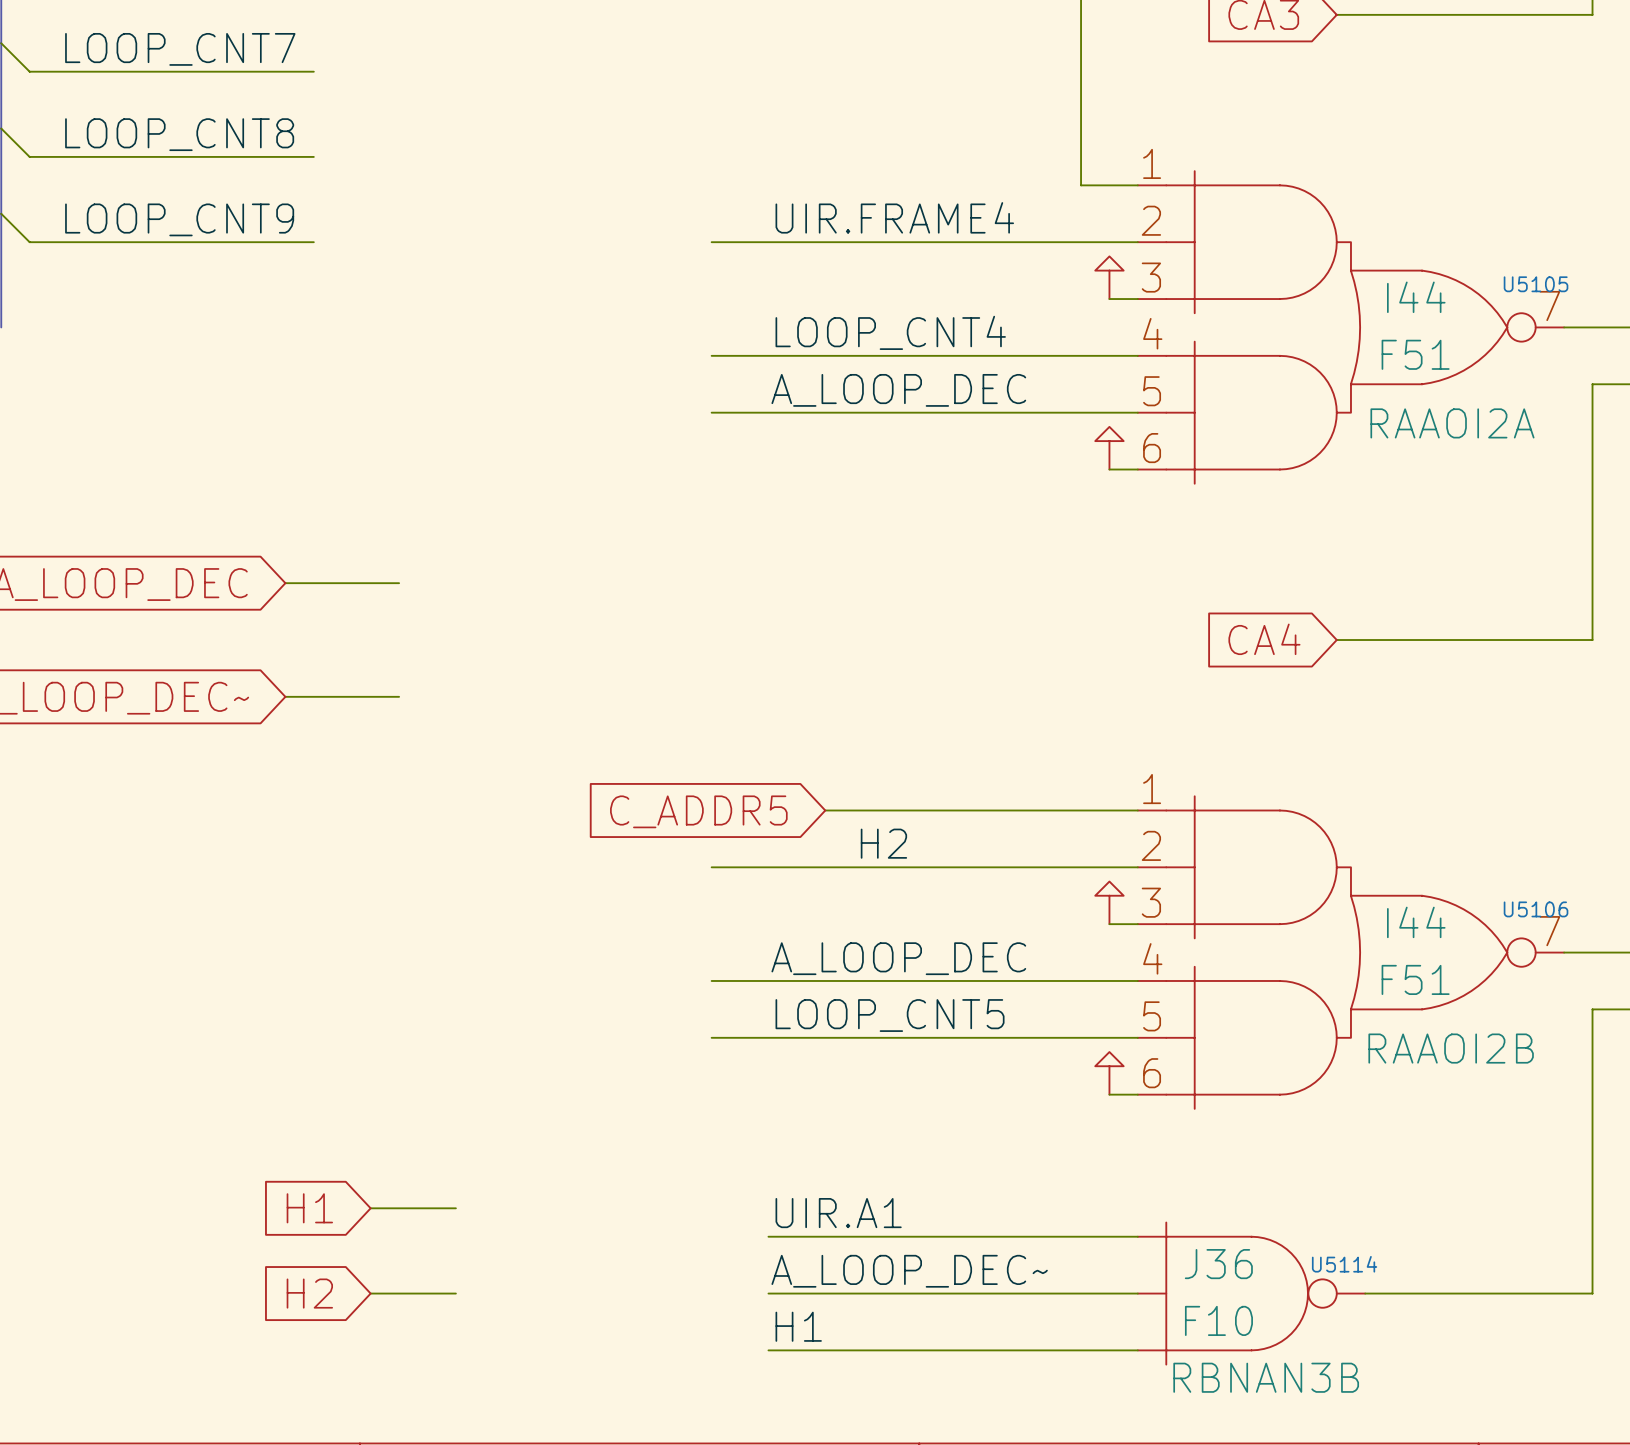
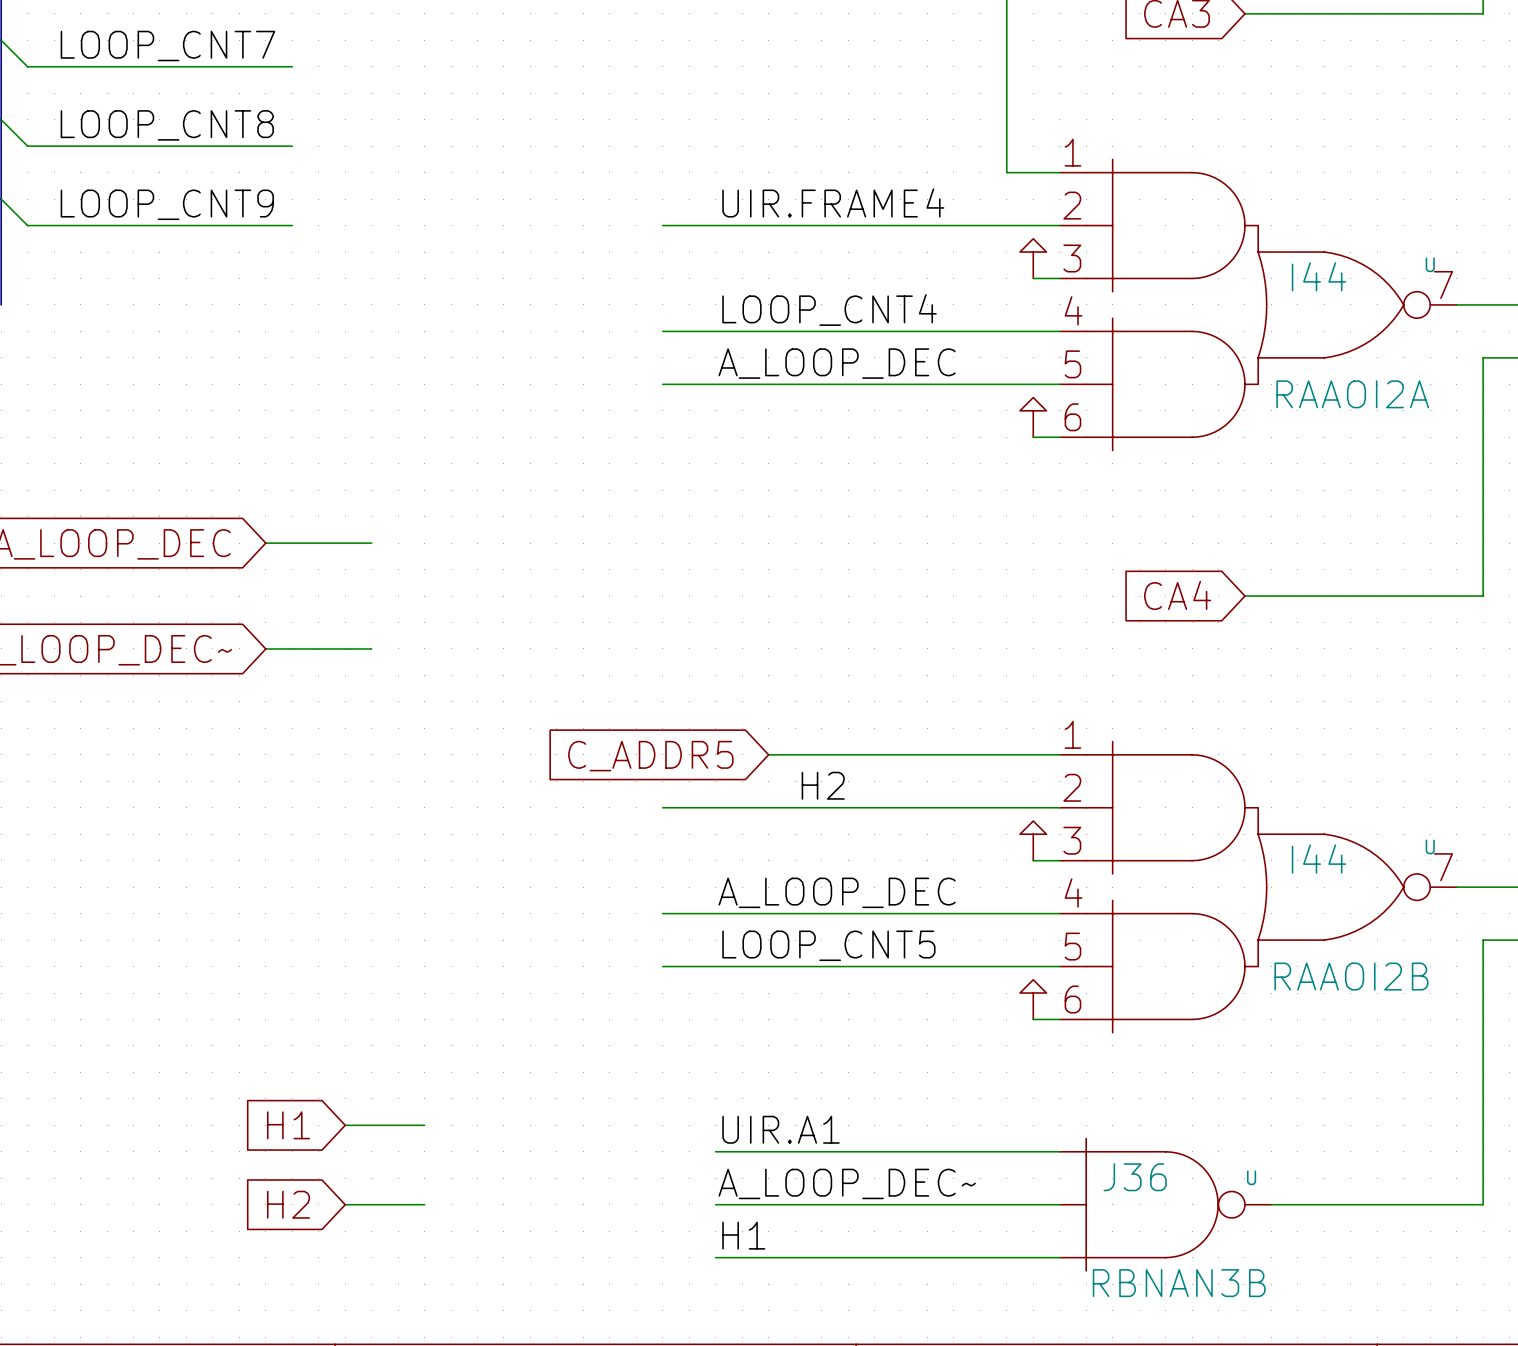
U5105 name: U5105 (1536, 284) -> U (1430, 264)
U5105 value: F51 (1415, 354) -> none
U5106 name: U5106 (1536, 909) -> U (1430, 846)
U5106 value: F51 (1415, 979) -> none
U5114 name: U5114 (1344, 1264) -> U (1251, 1177)
U5114 value: F10 (1218, 1320) -> none

